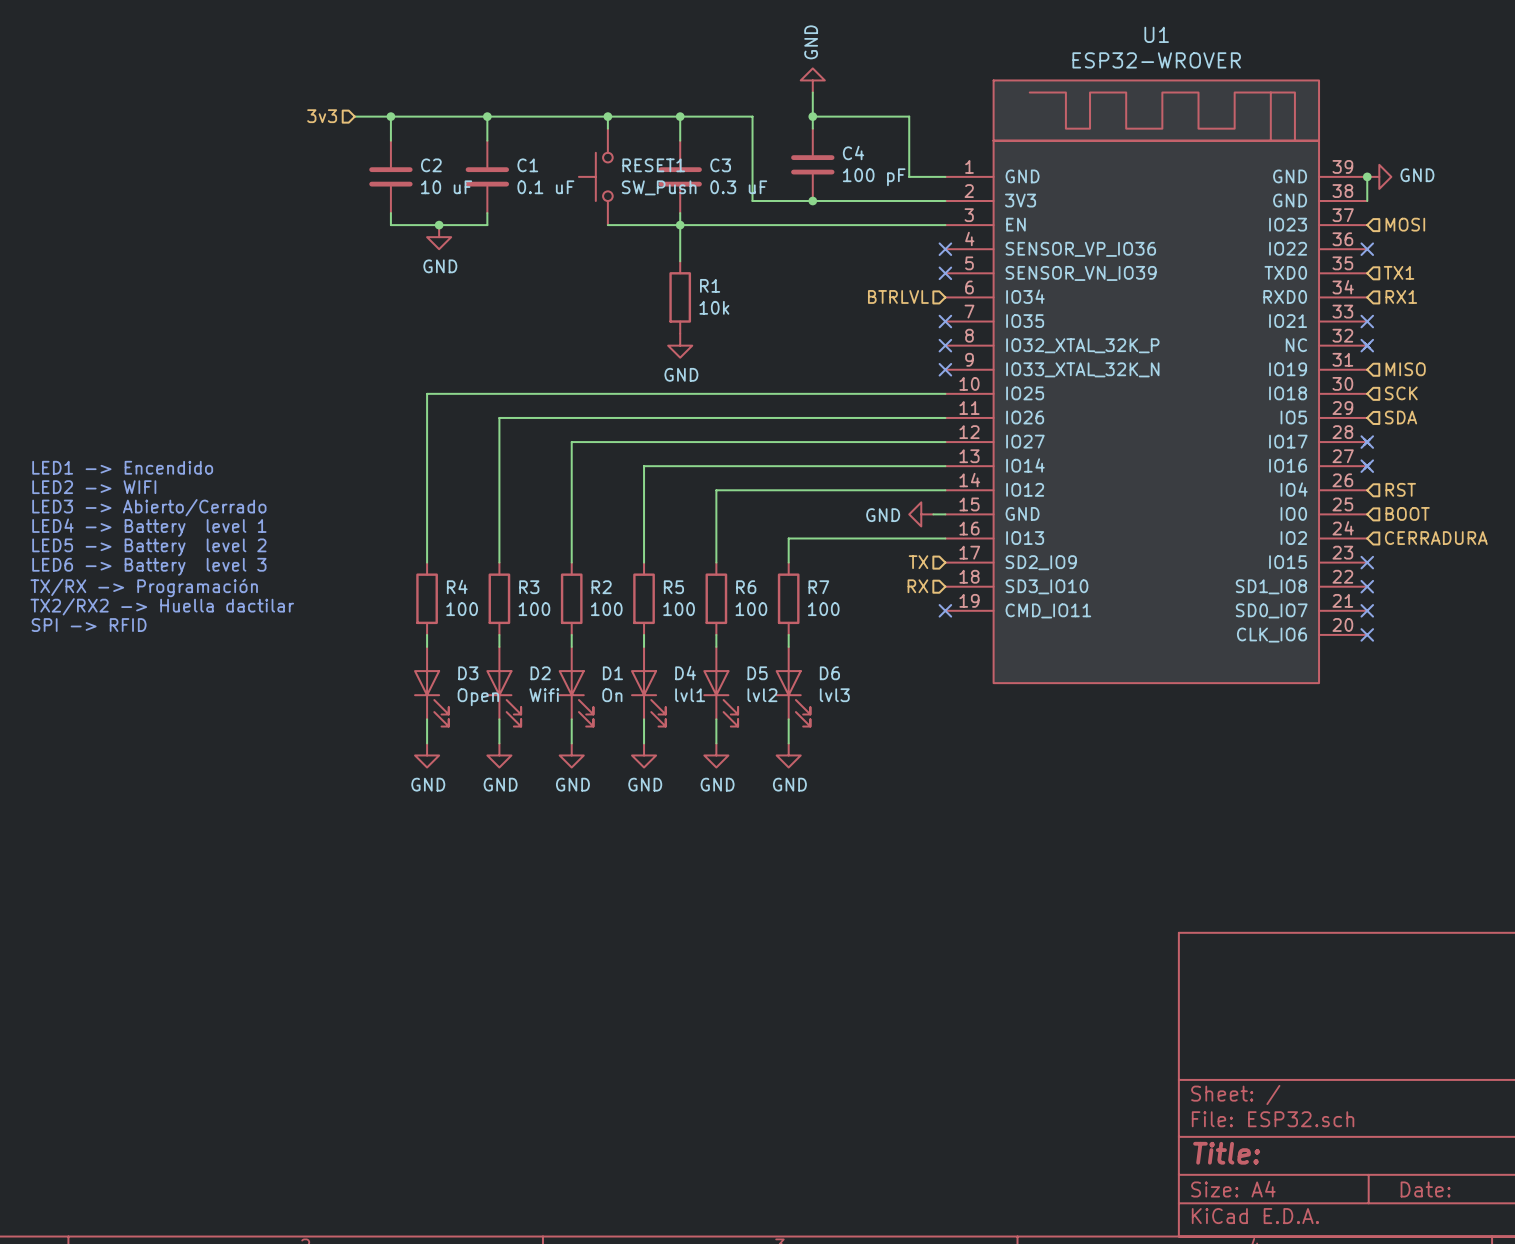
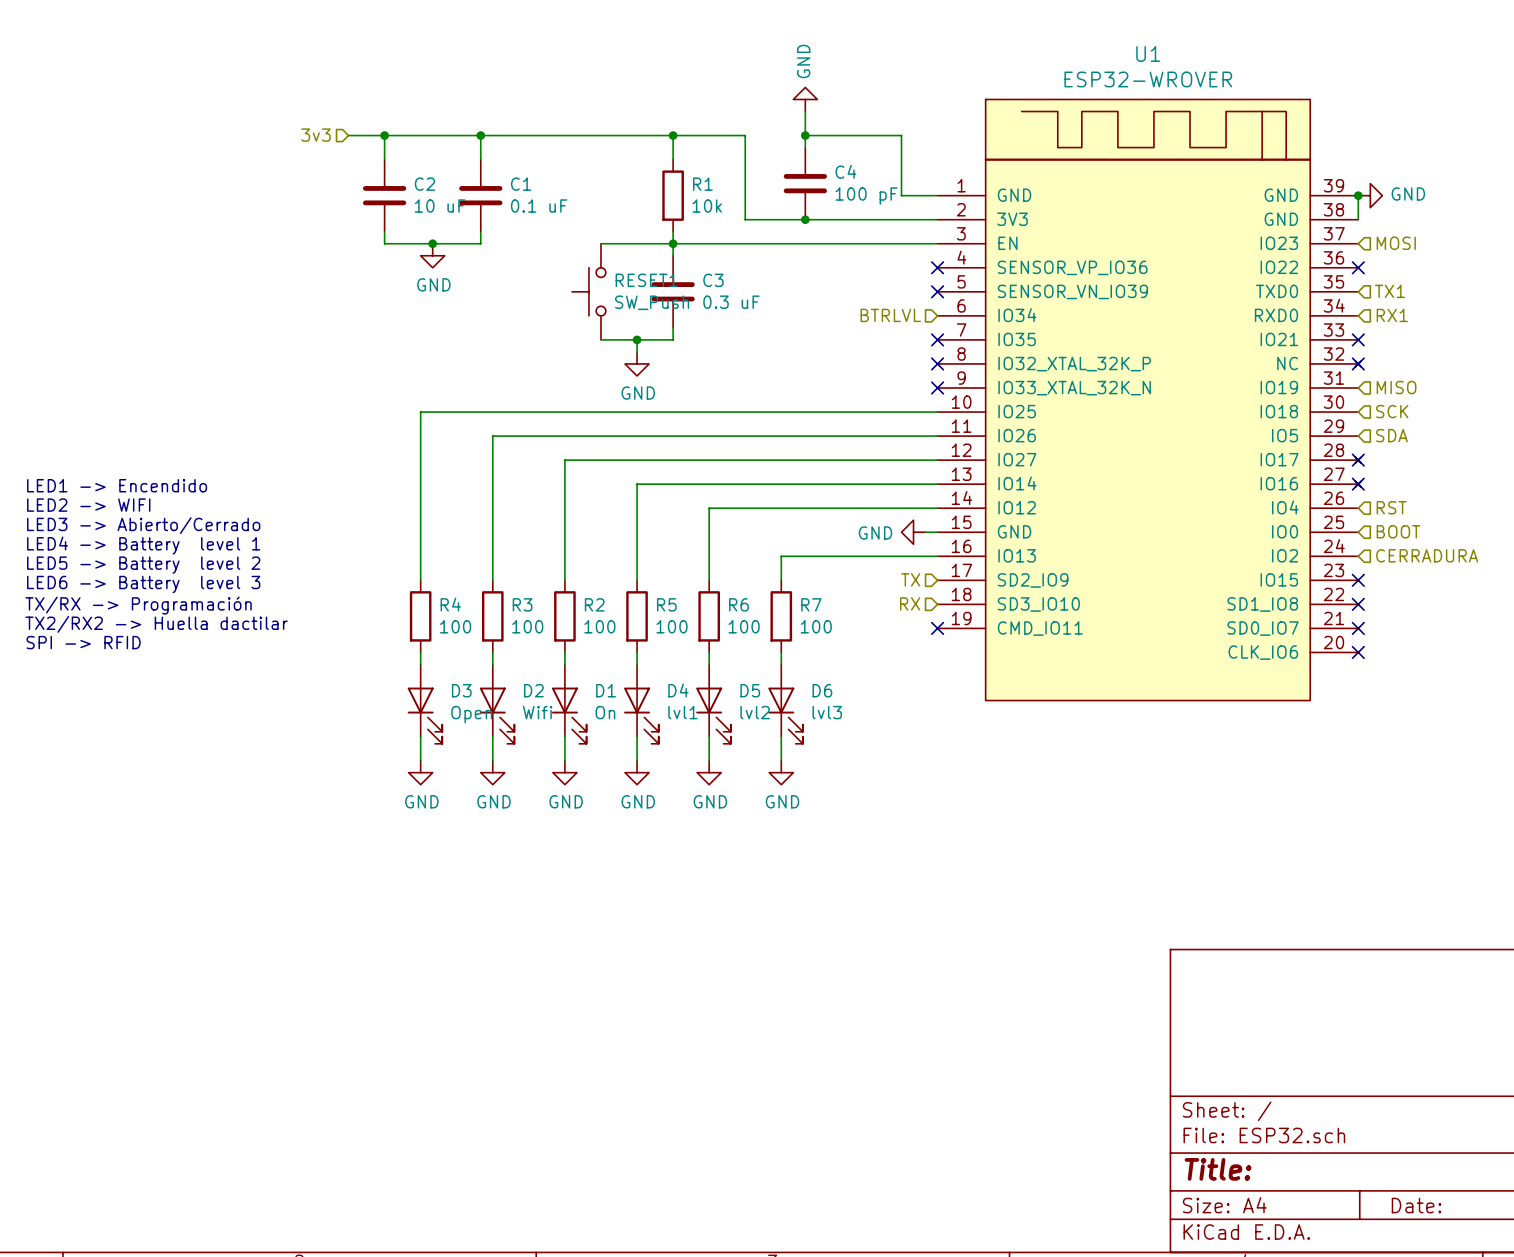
wire: (607, 116) (607, 128) -> (637, 339) (637, 351)
junction: (607, 116) -> none
RESET1 position: (595, 176) -> (588, 291)
C3 position: (680, 176) -> (673, 291)
R1 position: (680, 297) -> (673, 195)
wire: none -> (673, 327) (673, 339) (600, 339)
junction: none -> (637, 339)
power symbol position: GND (680, 345) -> GND (637, 363)

